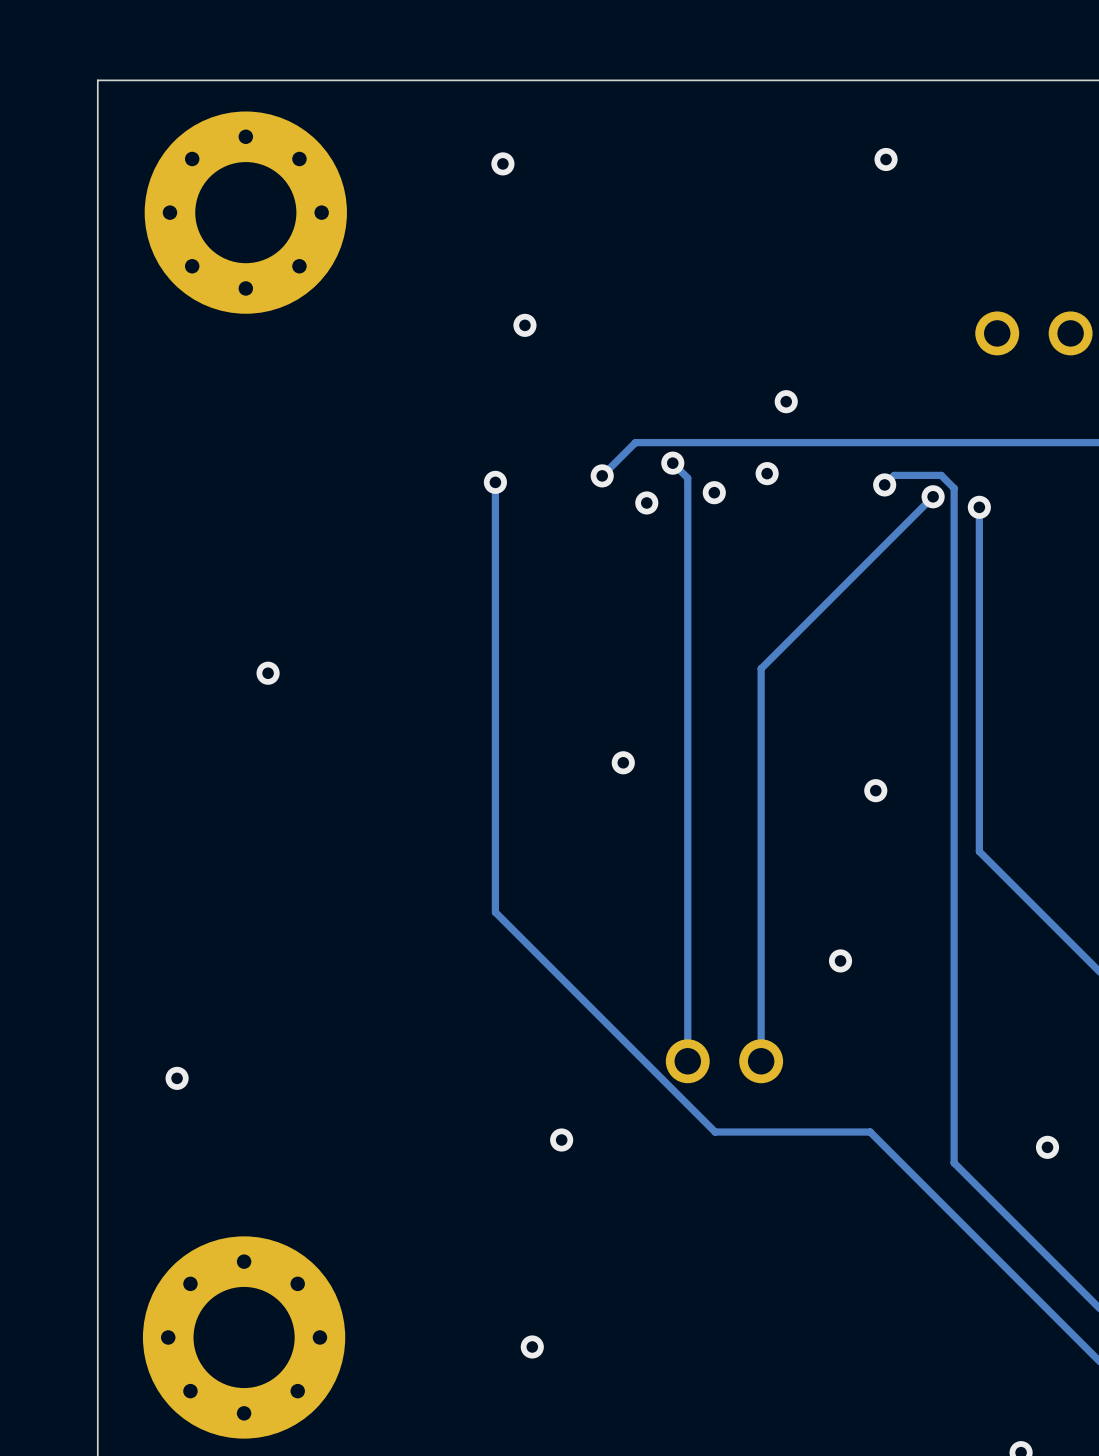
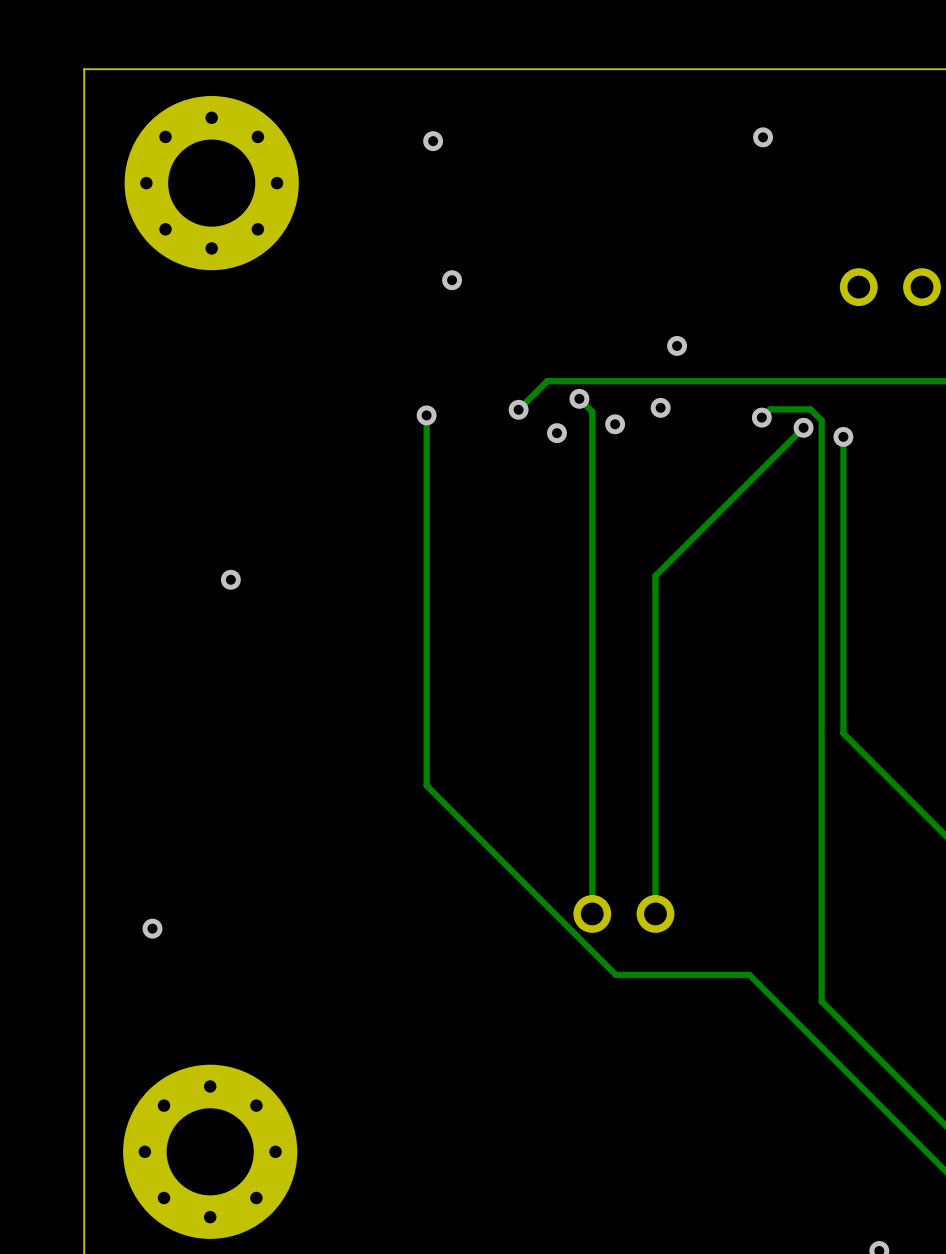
via: (623, 762) -> none
via: (875, 790) -> none
via: (840, 960) -> none
via: (561, 1140) -> none
via: (1047, 1147) -> none
via: (532, 1346) -> none

